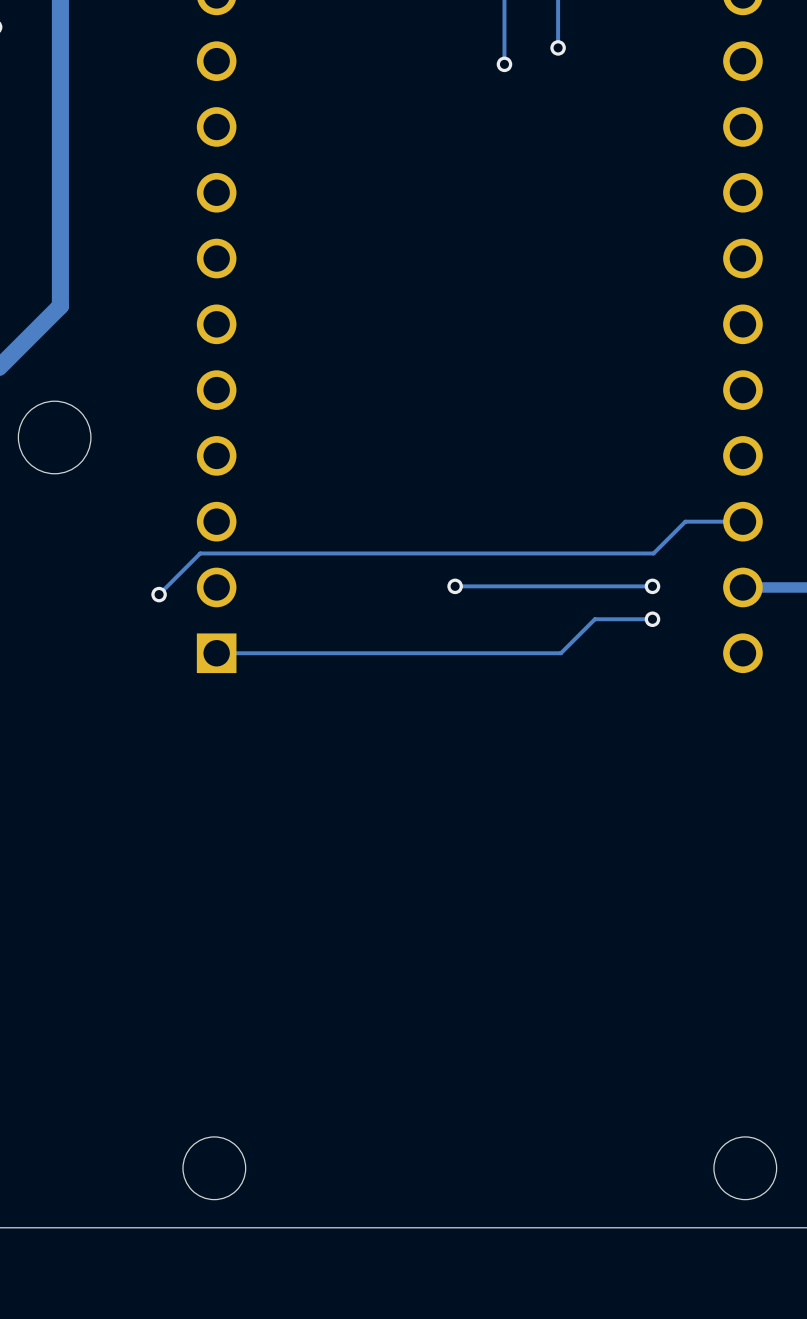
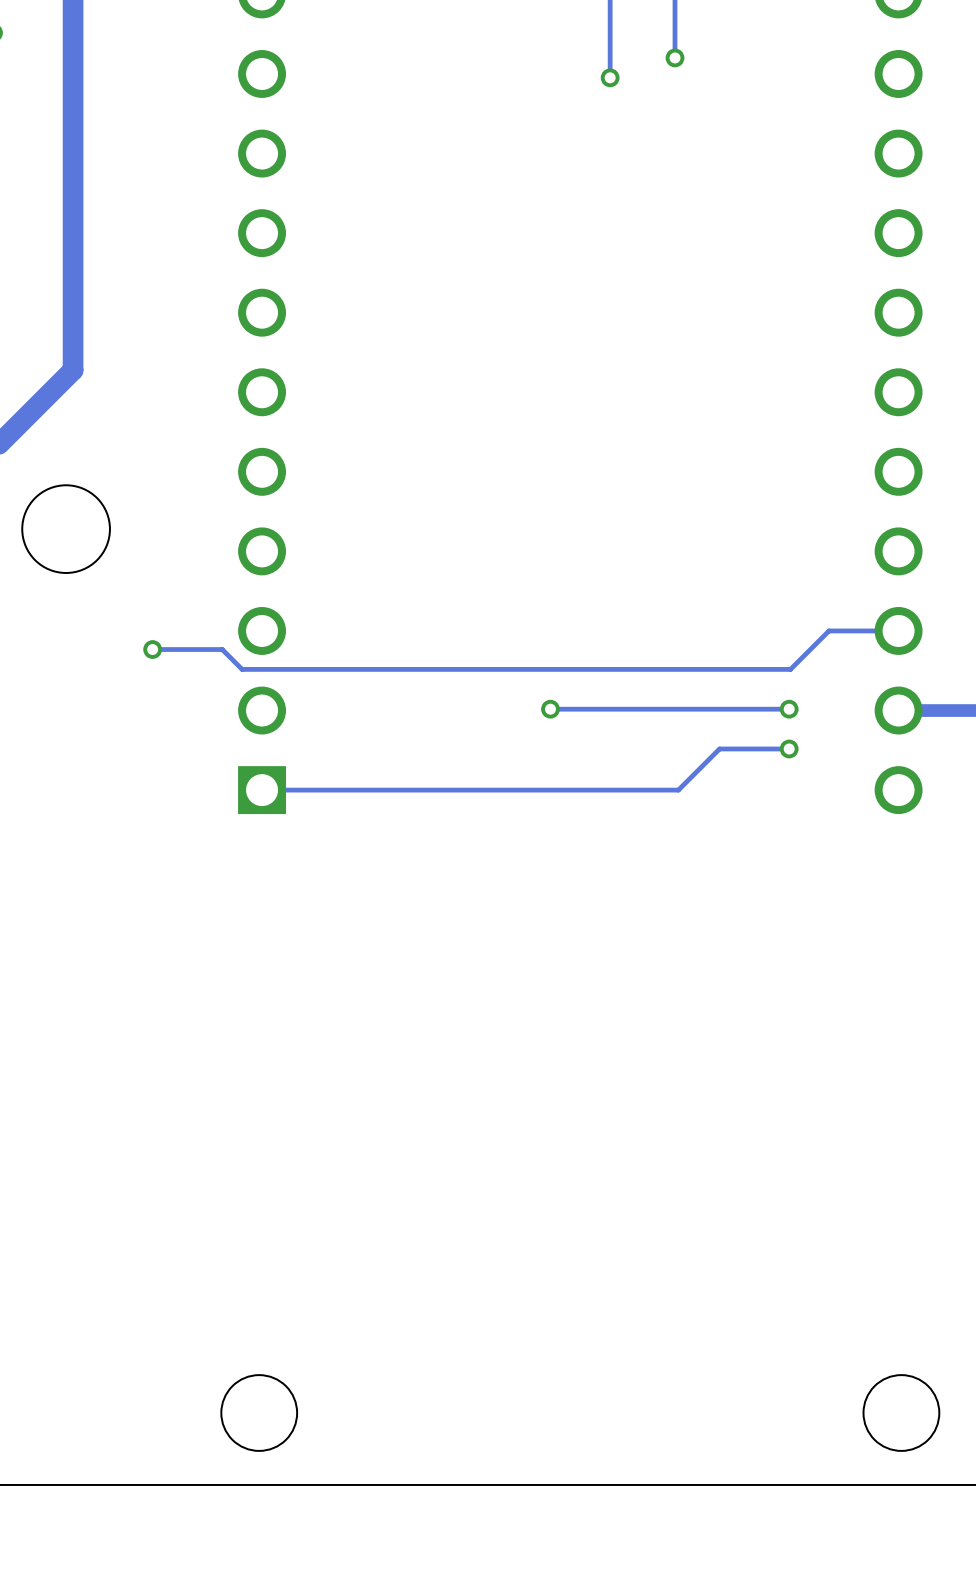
track: (200, 553) (159, 594) -> (242, 669) (222, 649) (152, 649)
via position: (159, 594) -> (152, 649)

